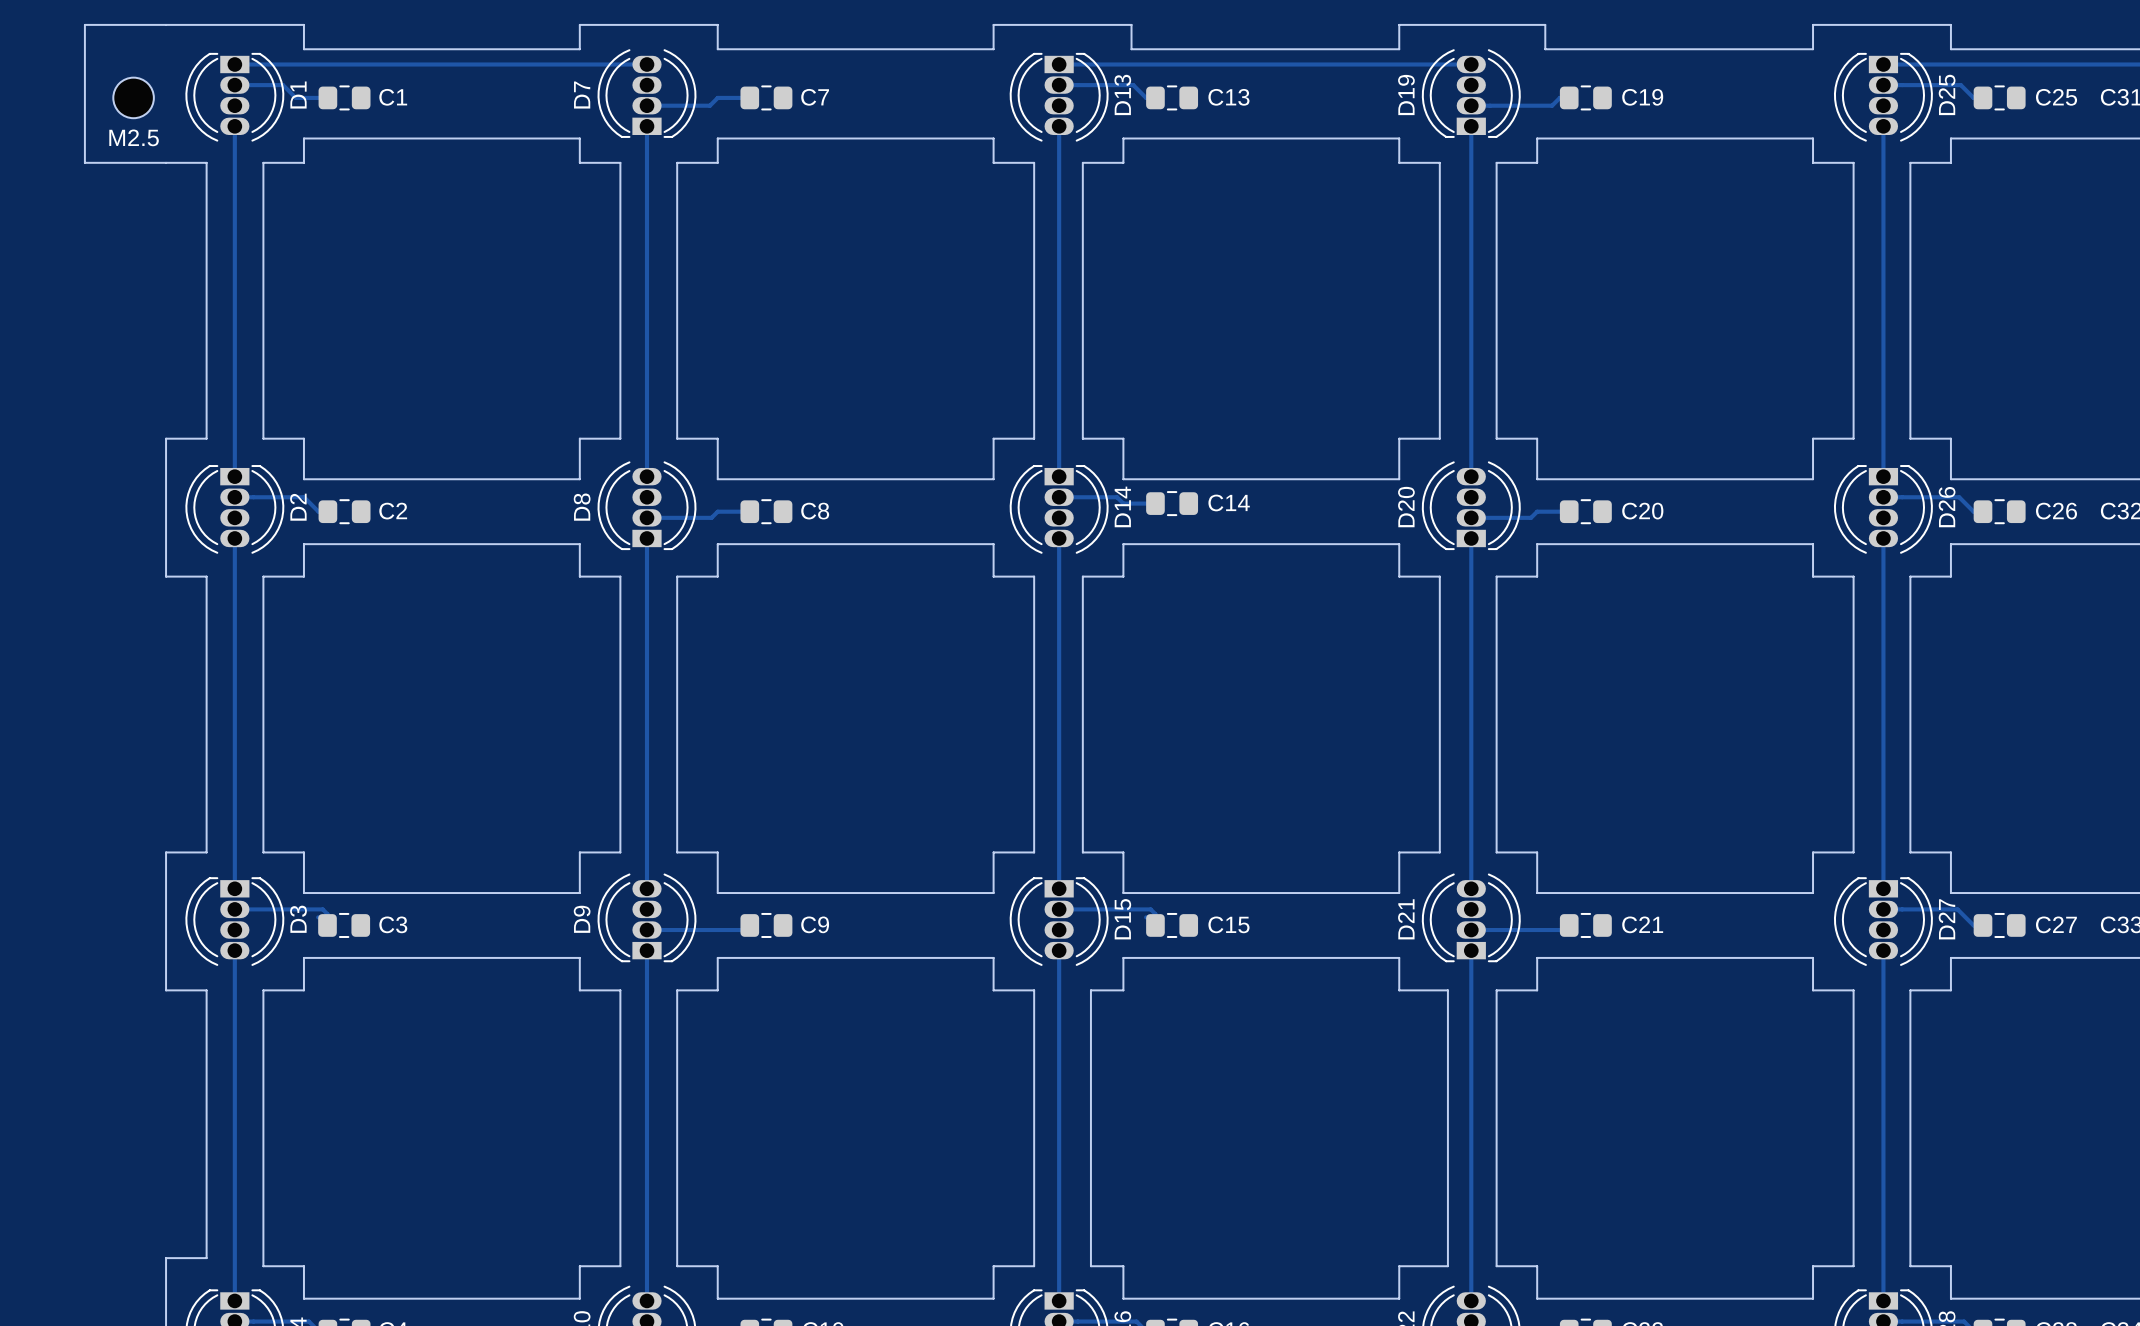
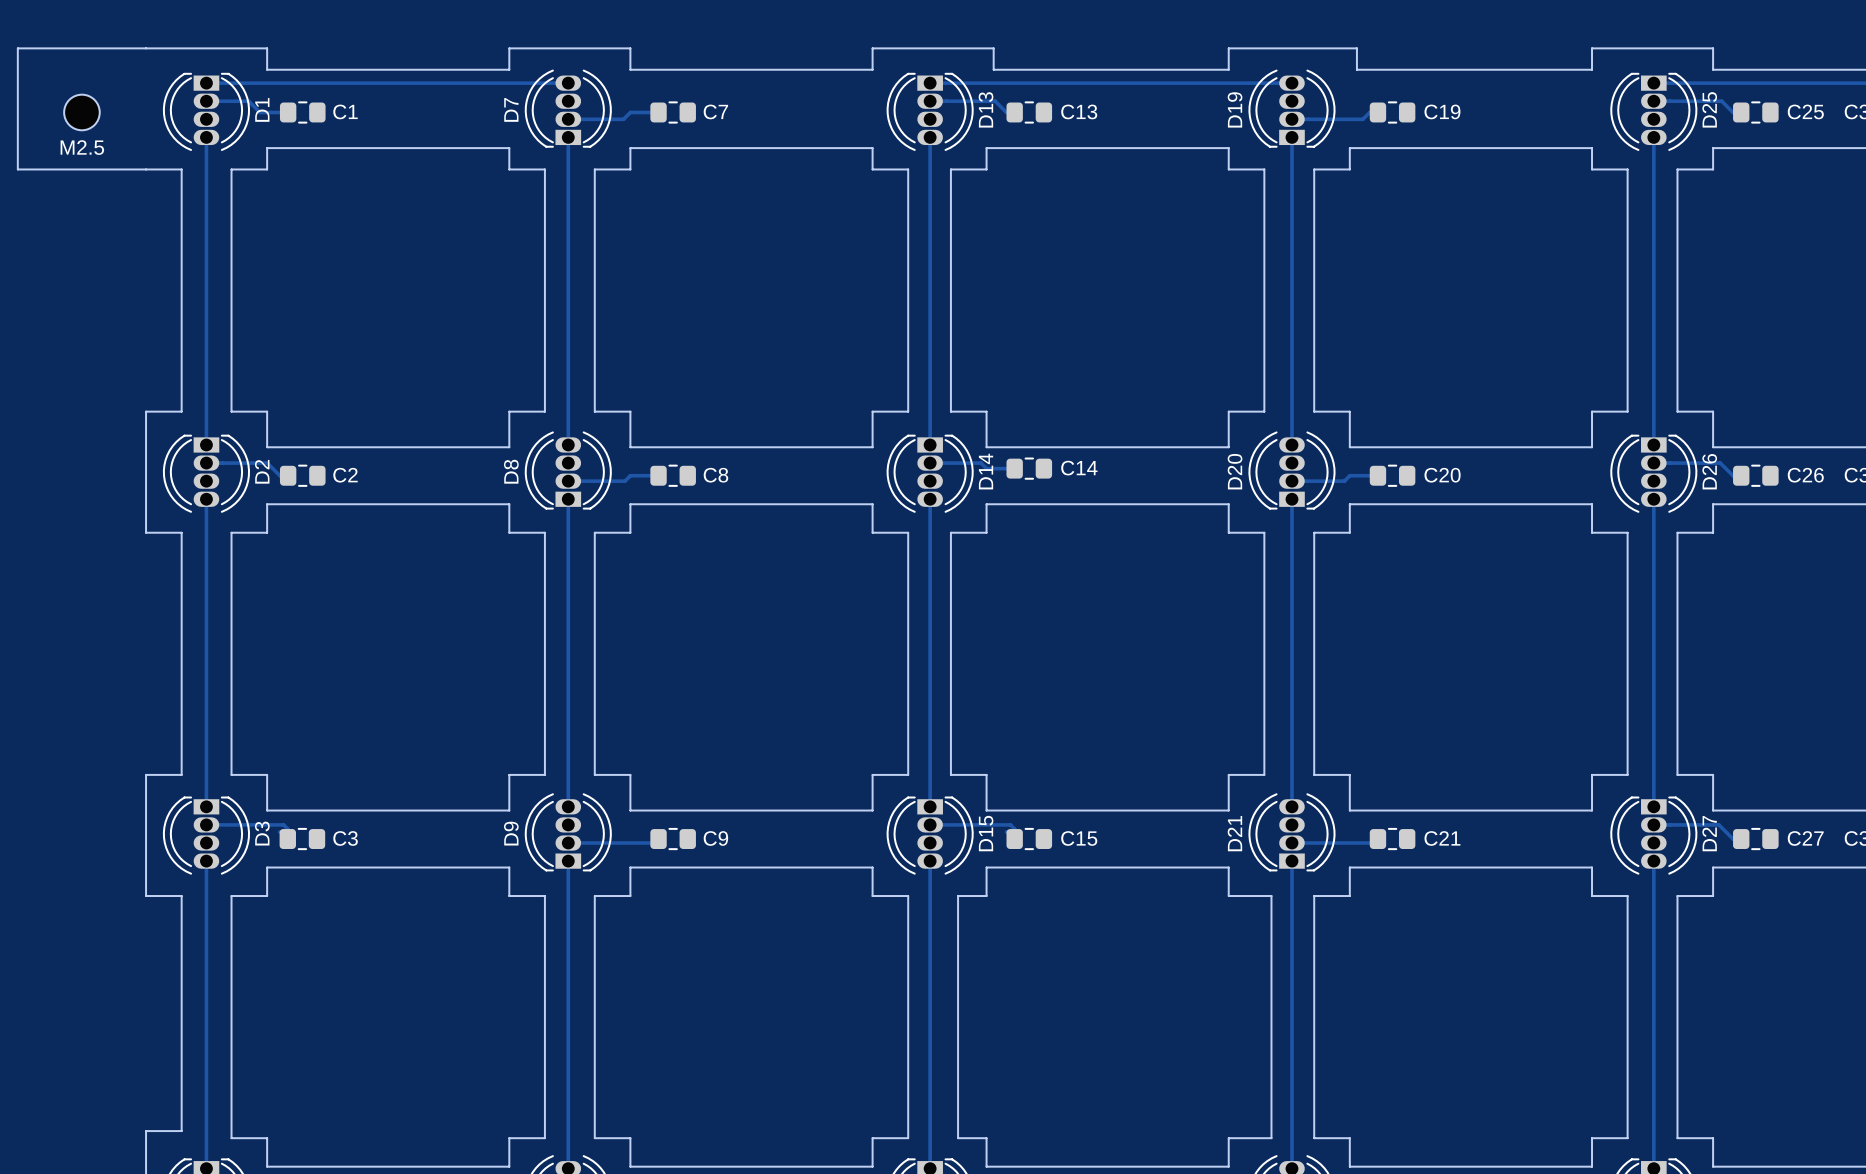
board edge: (84, 24) (84, 162) -> (74, 48) (17, 48) (17, 169) (74, 169)
M2.5 position: (133, 97) -> (81, 112)

